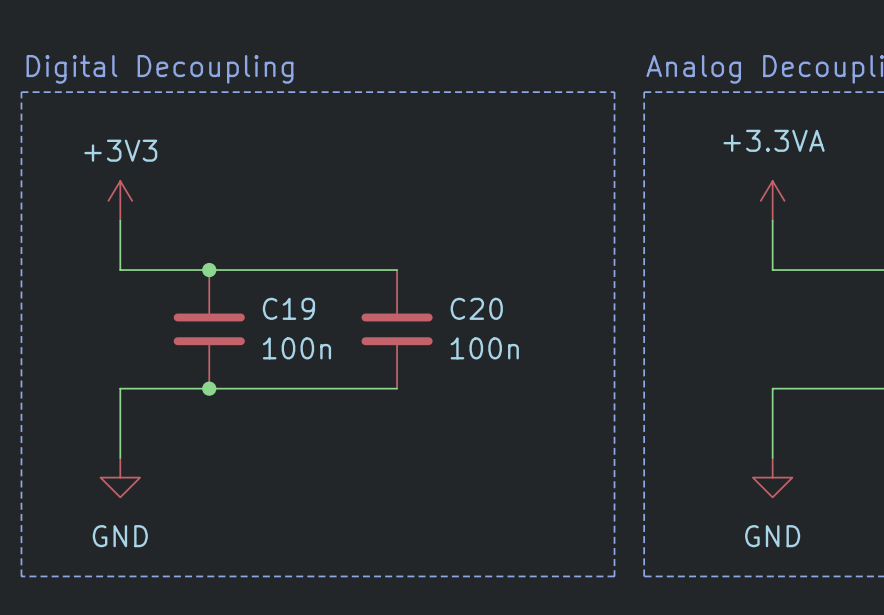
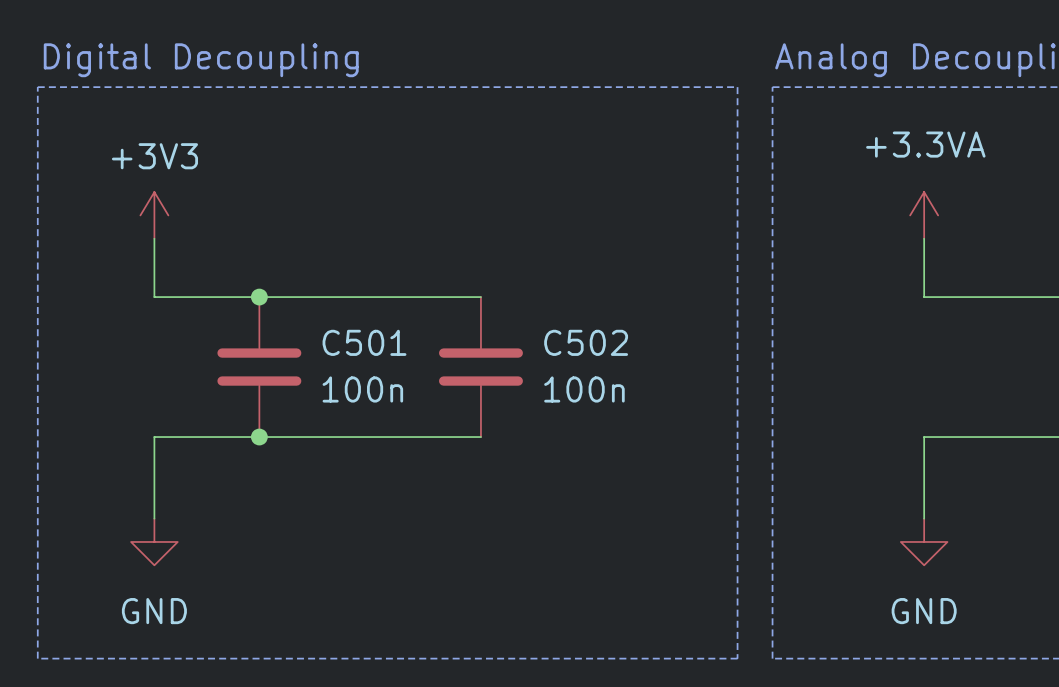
C19 name: C19 (288, 308) -> C501 (364, 342)
C20 name: C20 (476, 308) -> C502 (586, 342)

